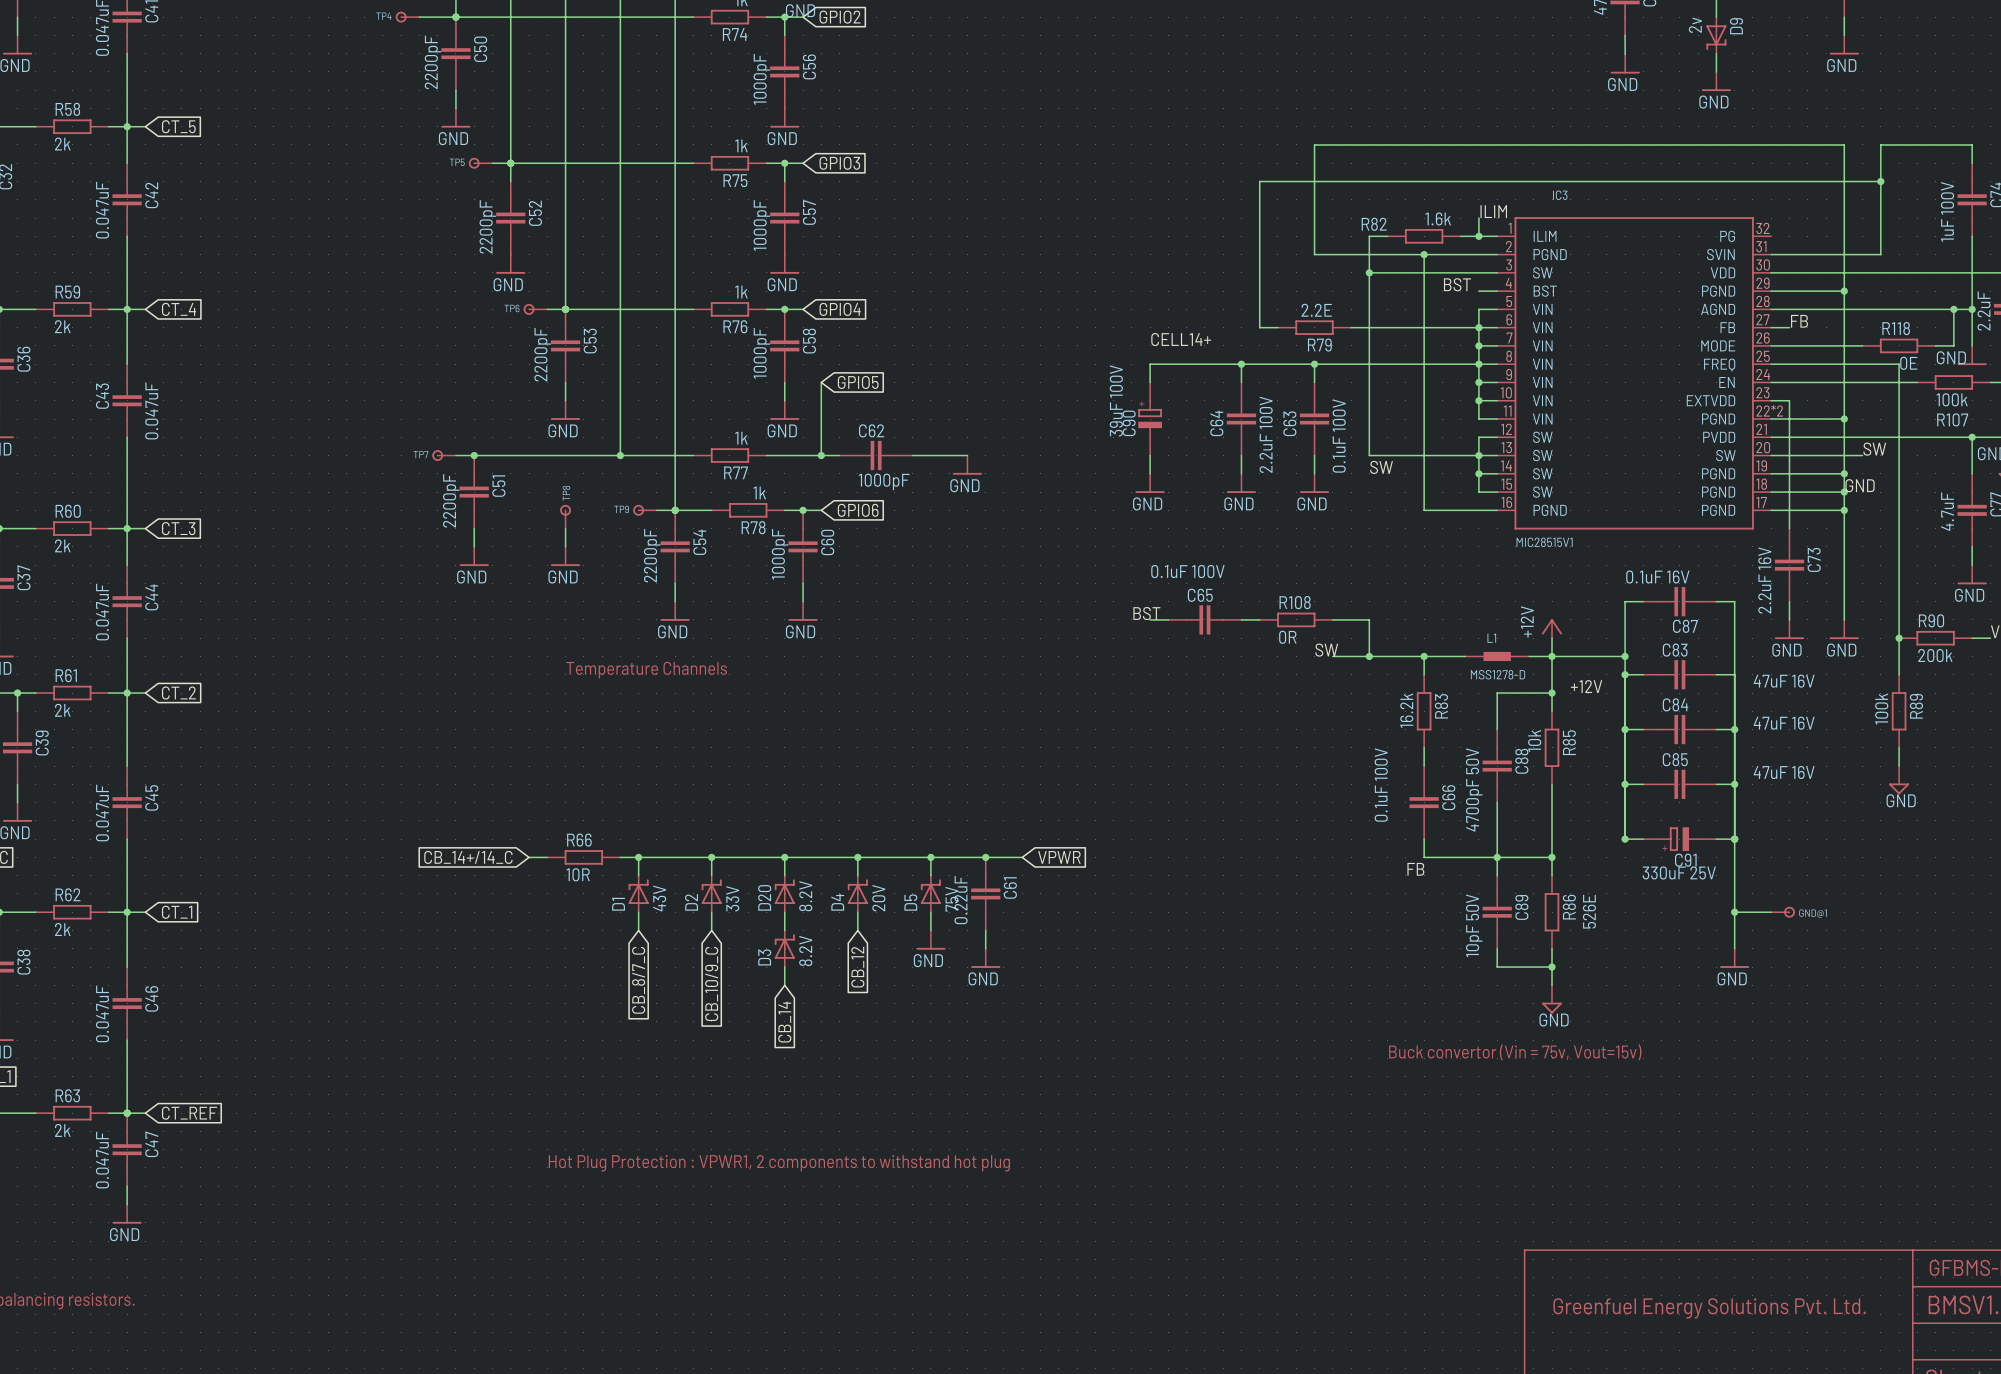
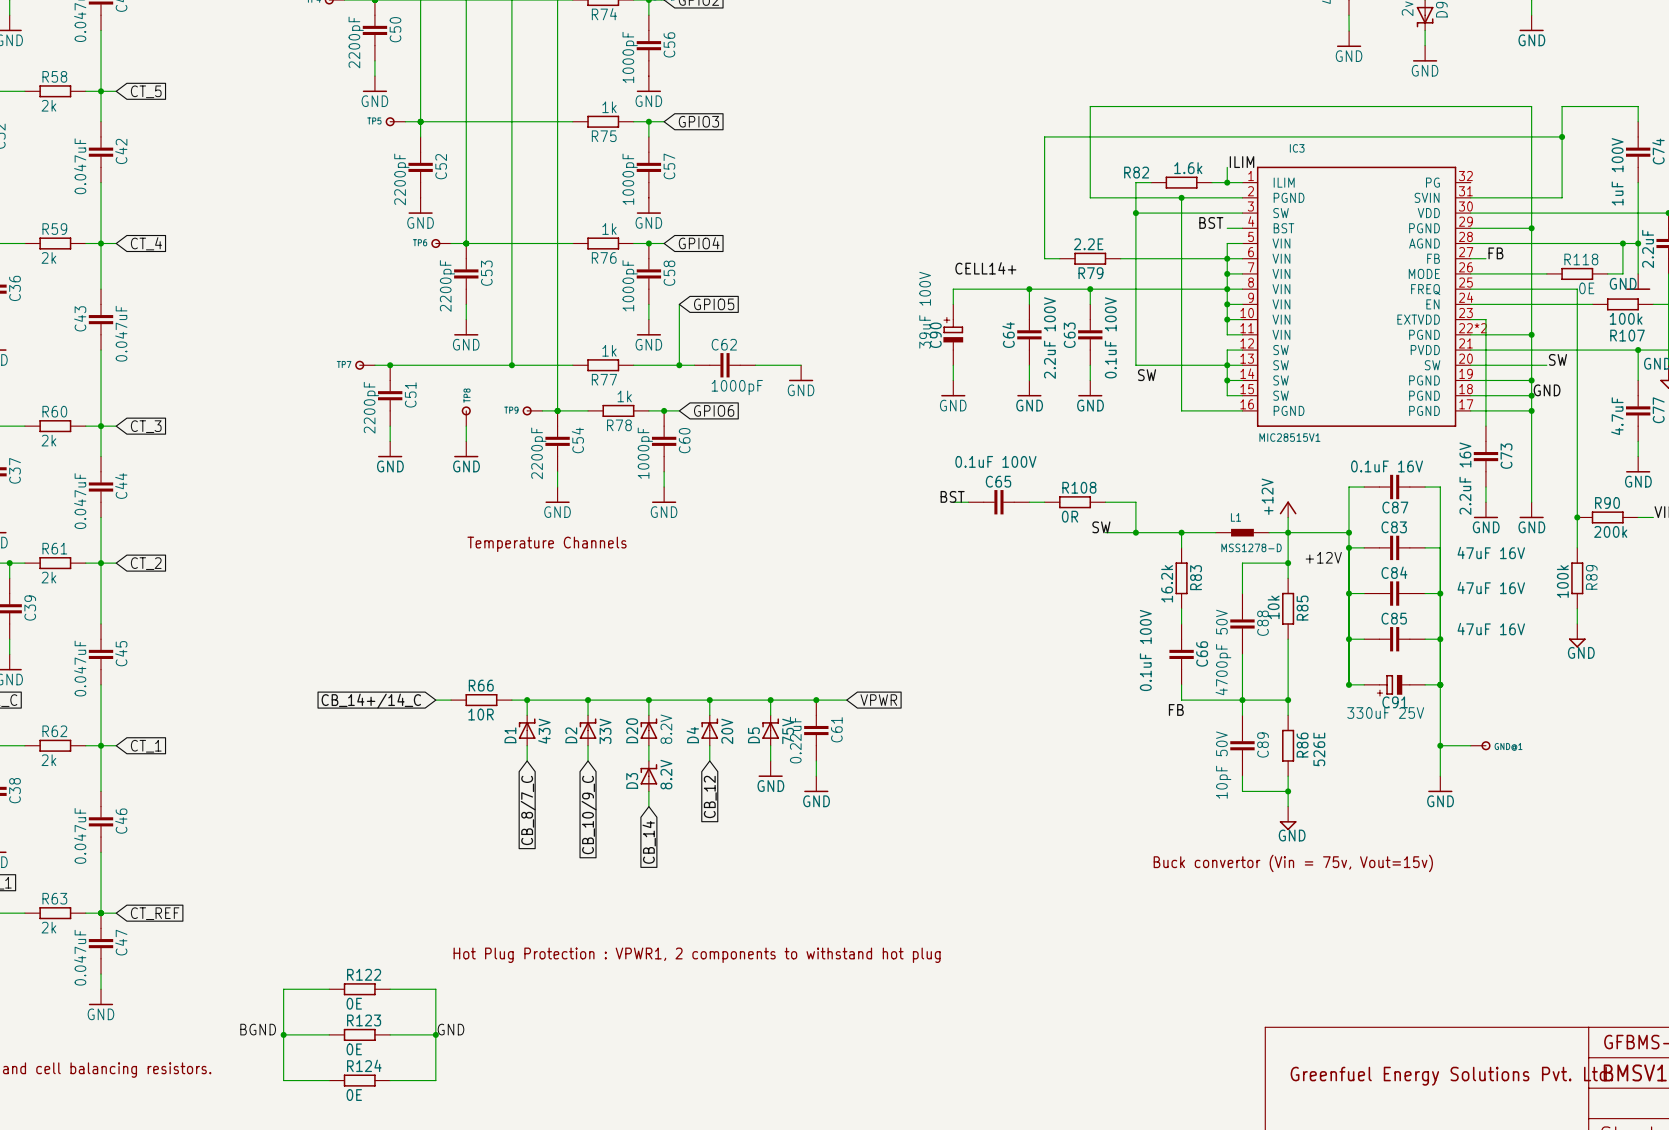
wire: none -> (329, 989) (283, 989) (283, 1080) (329, 1080)
R122: none -> 0E (359, 989)
wire: none -> (390, 989) (435, 989) (435, 1080) (390, 1080)
label: none -> BGND (258, 1029)
label: none -> GND (451, 1029)
wire: none -> (283, 1034) (329, 1034)
junction: none -> (283, 1034)
R123: none -> 0E (359, 1034)
wire: none -> (390, 1034) (435, 1034)
junction: none -> (435, 1034)
R124: none -> 0E (359, 1080)

